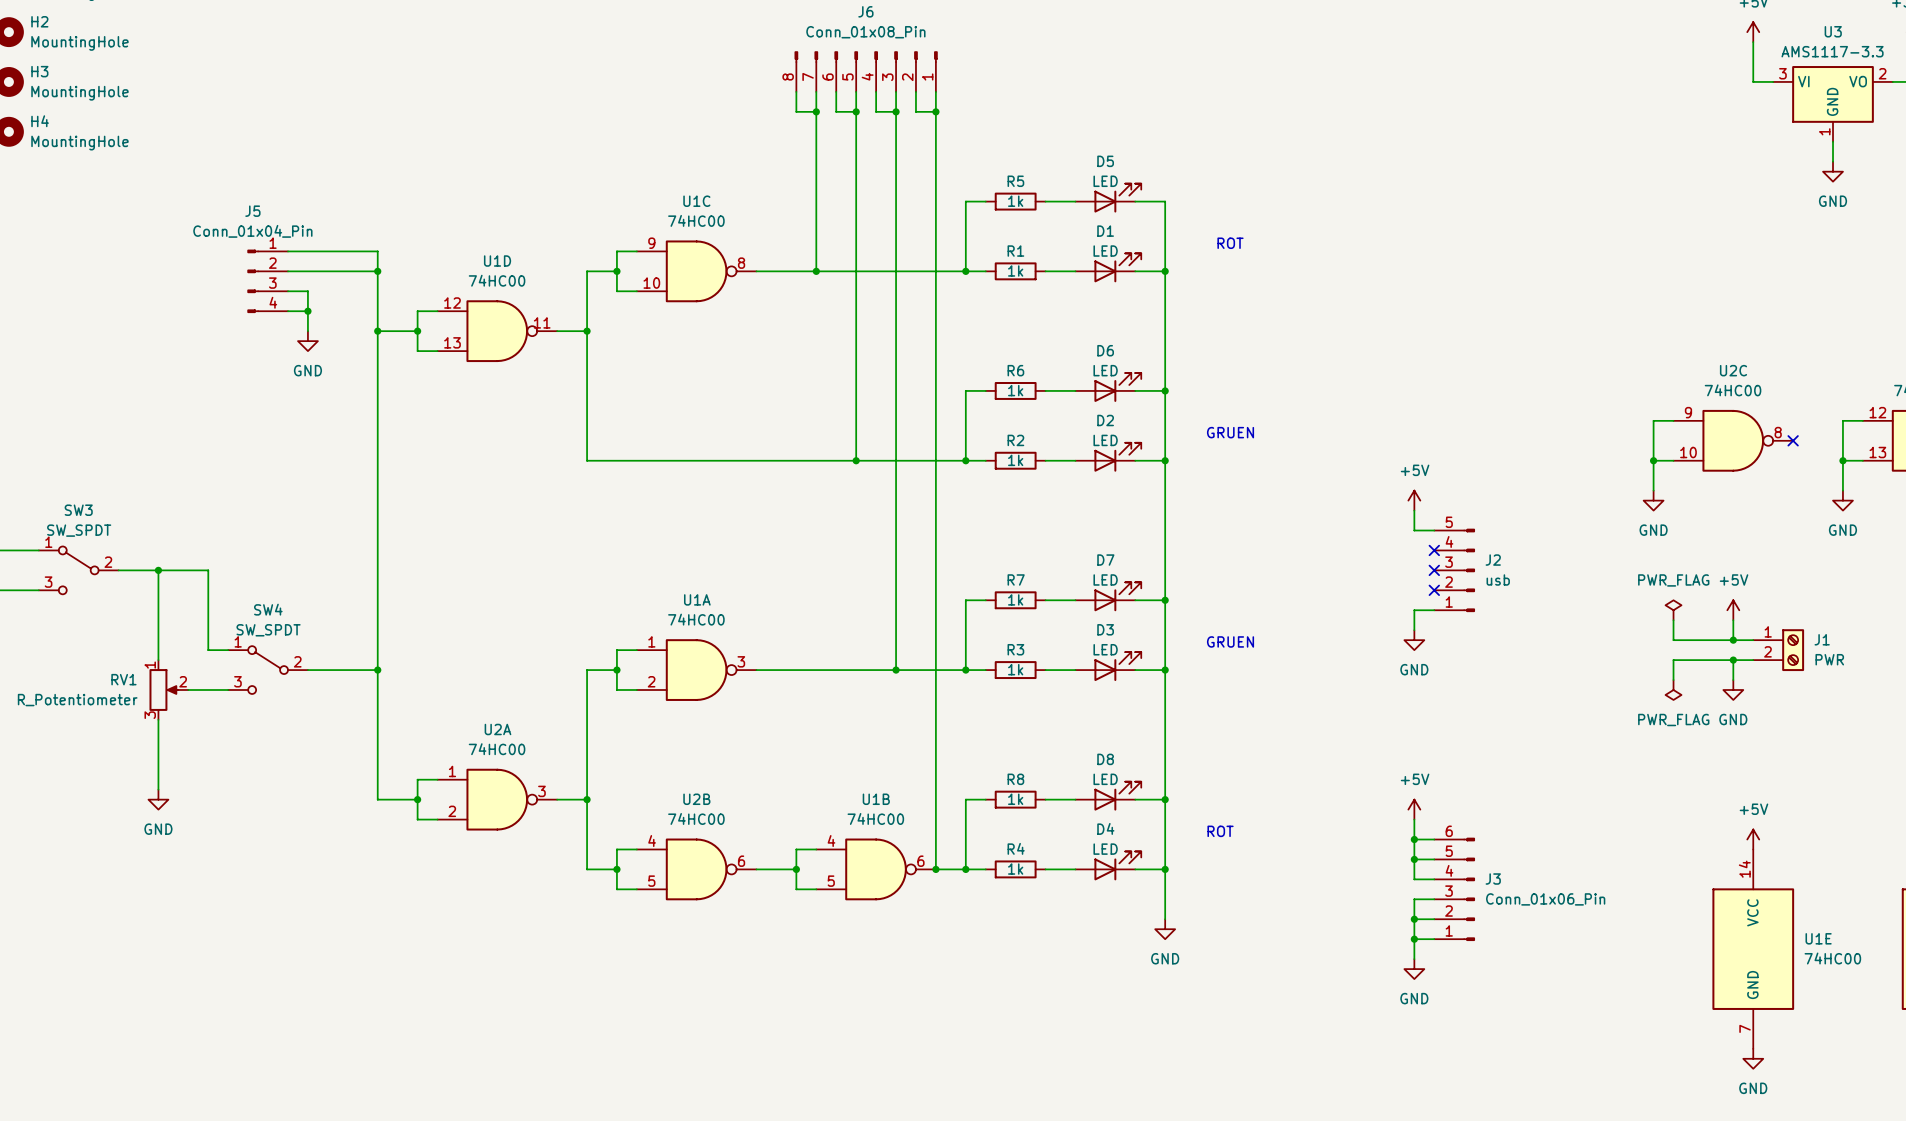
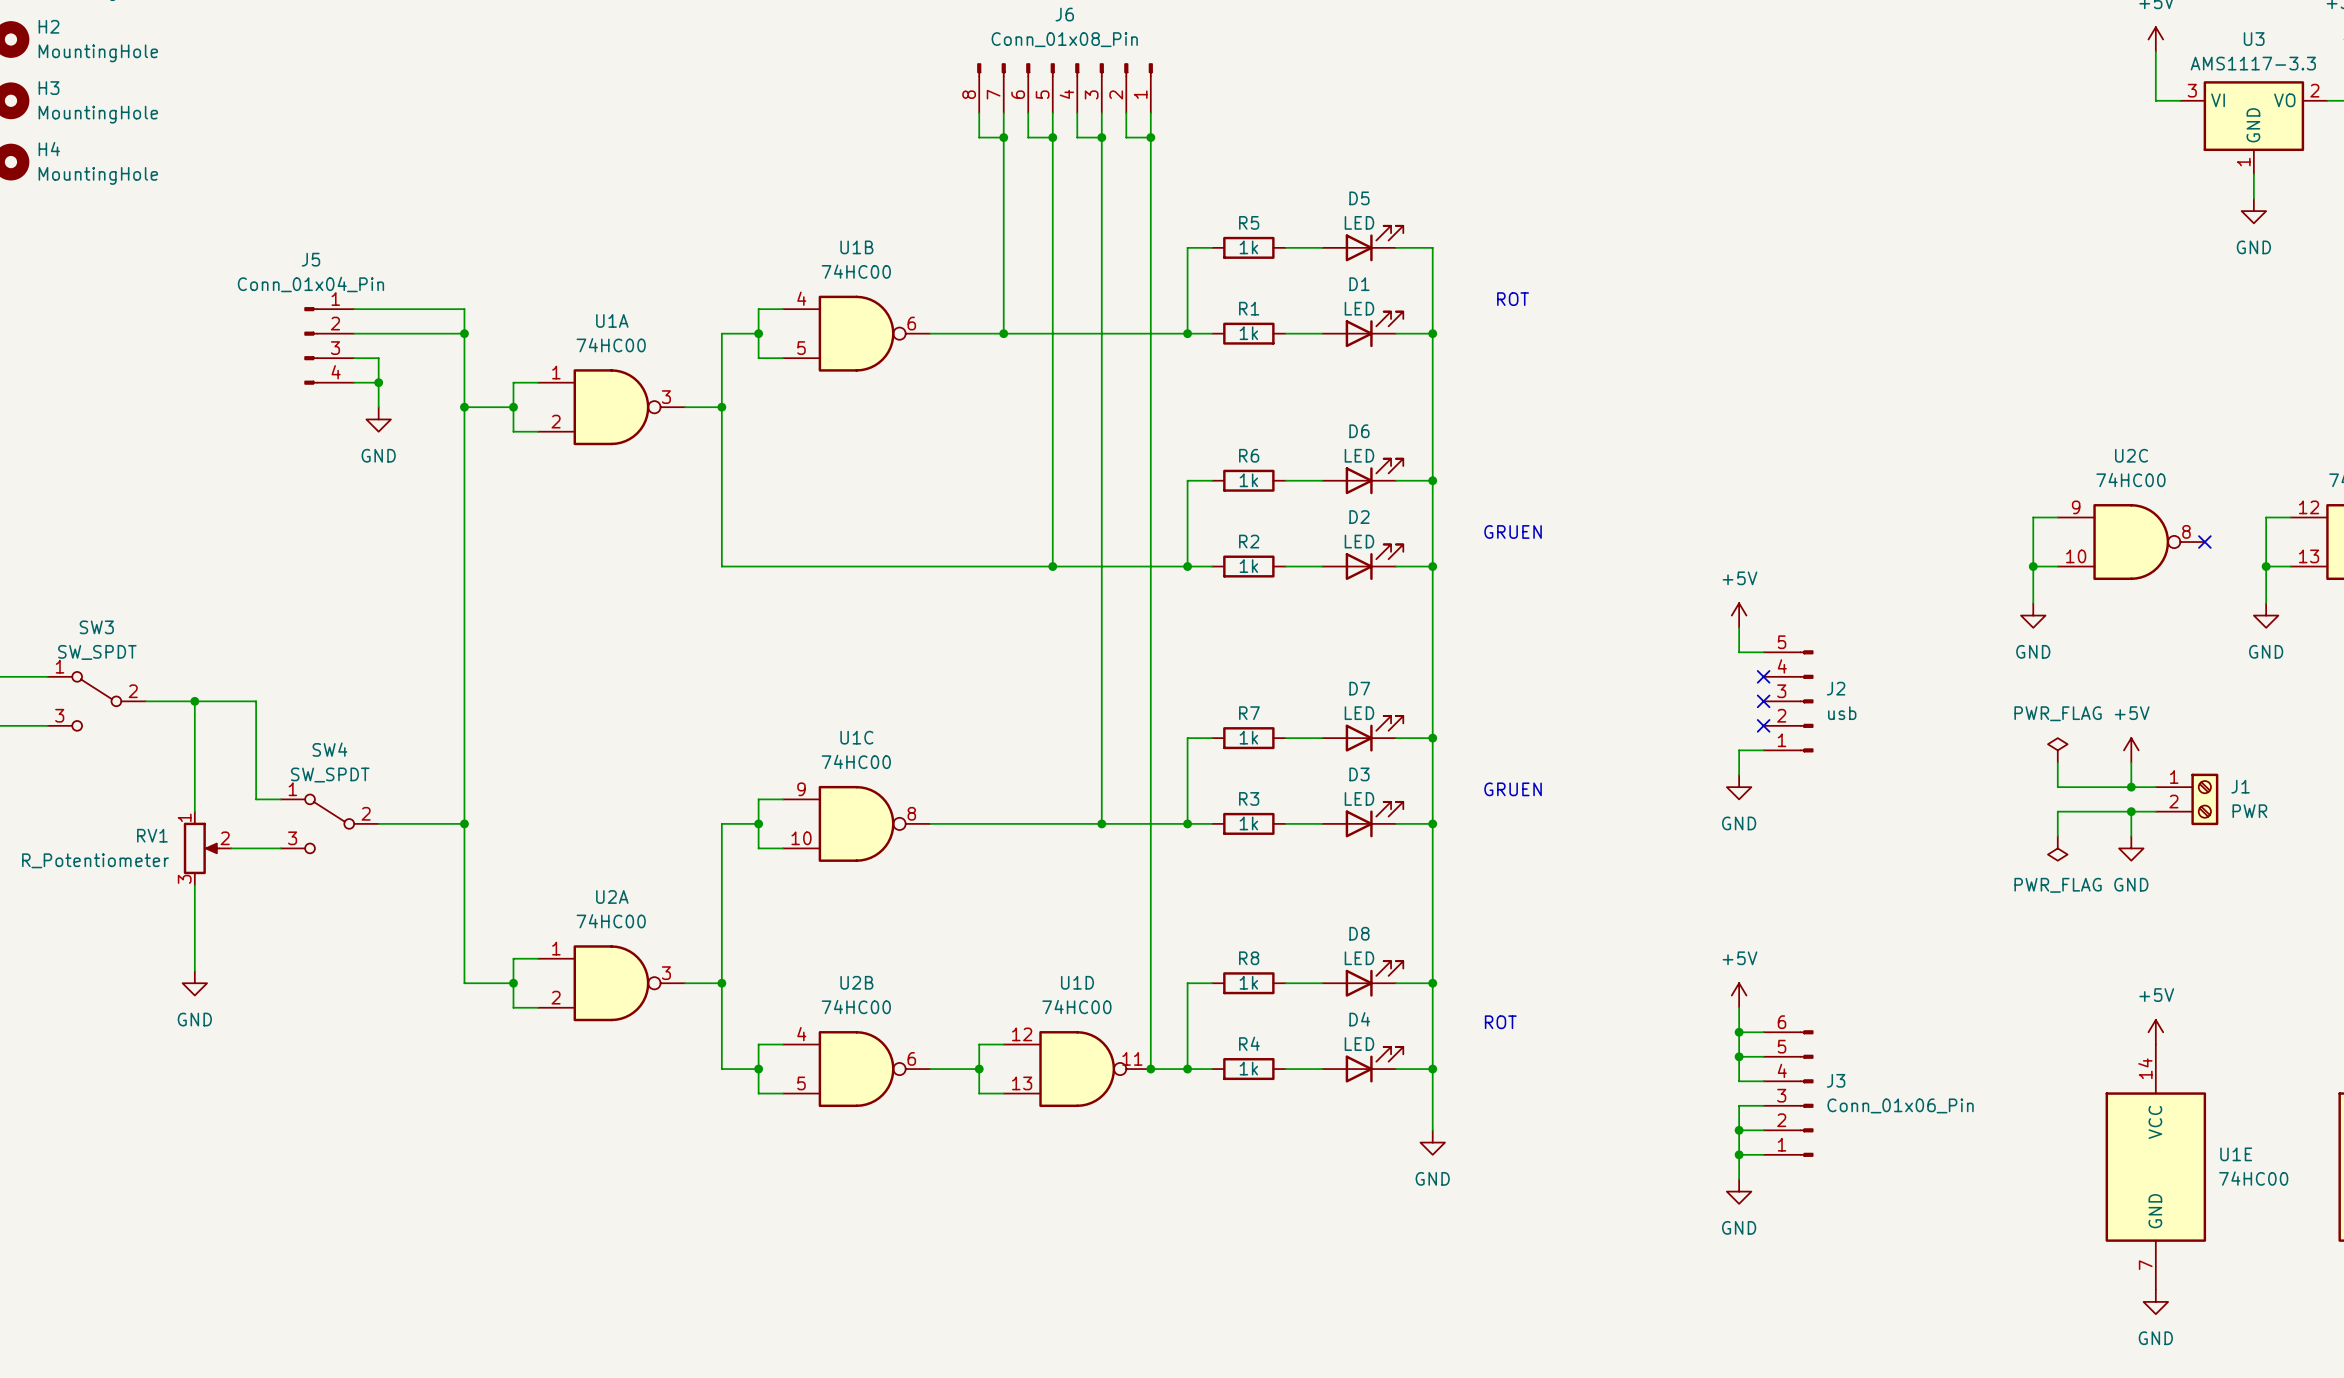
U1C position: (696, 271) -> (856, 823)
U1D position: (497, 331) -> (1077, 1069)
U1A position: (696, 670) -> (611, 407)
U1B position: (876, 869) -> (856, 333)

